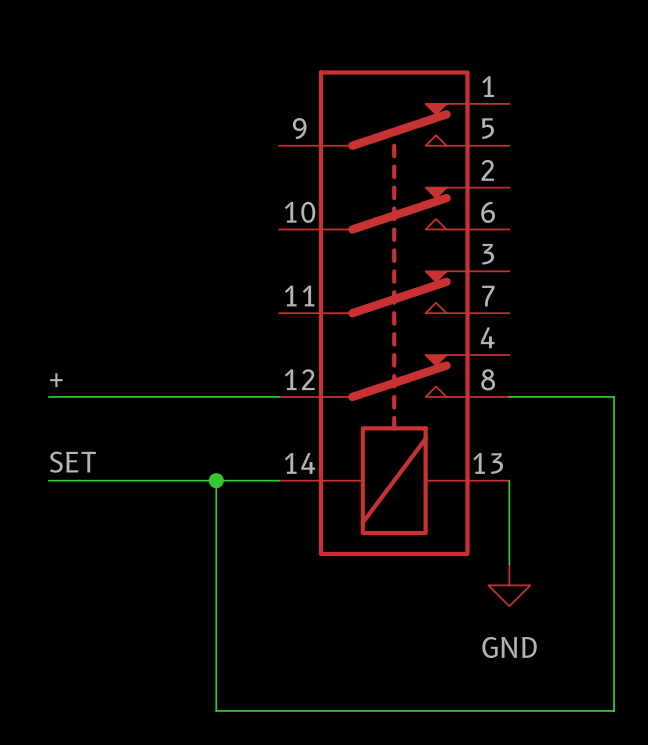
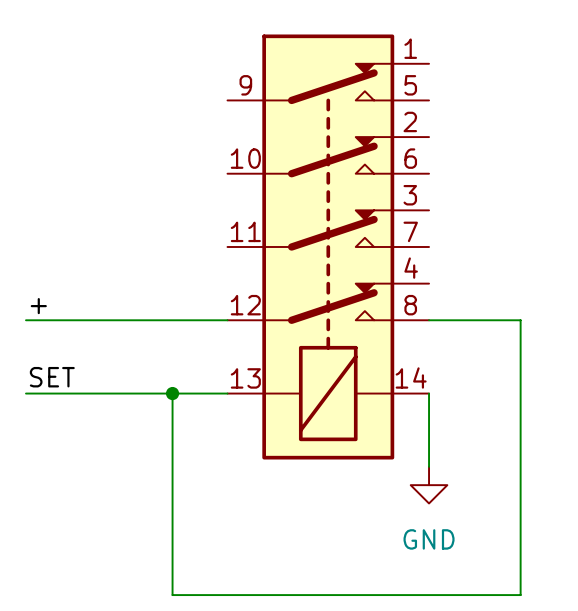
part pin number: 14 (300, 463) -> 13 (245, 378)
part pin number: 13 (488, 463) -> 14 (411, 378)

